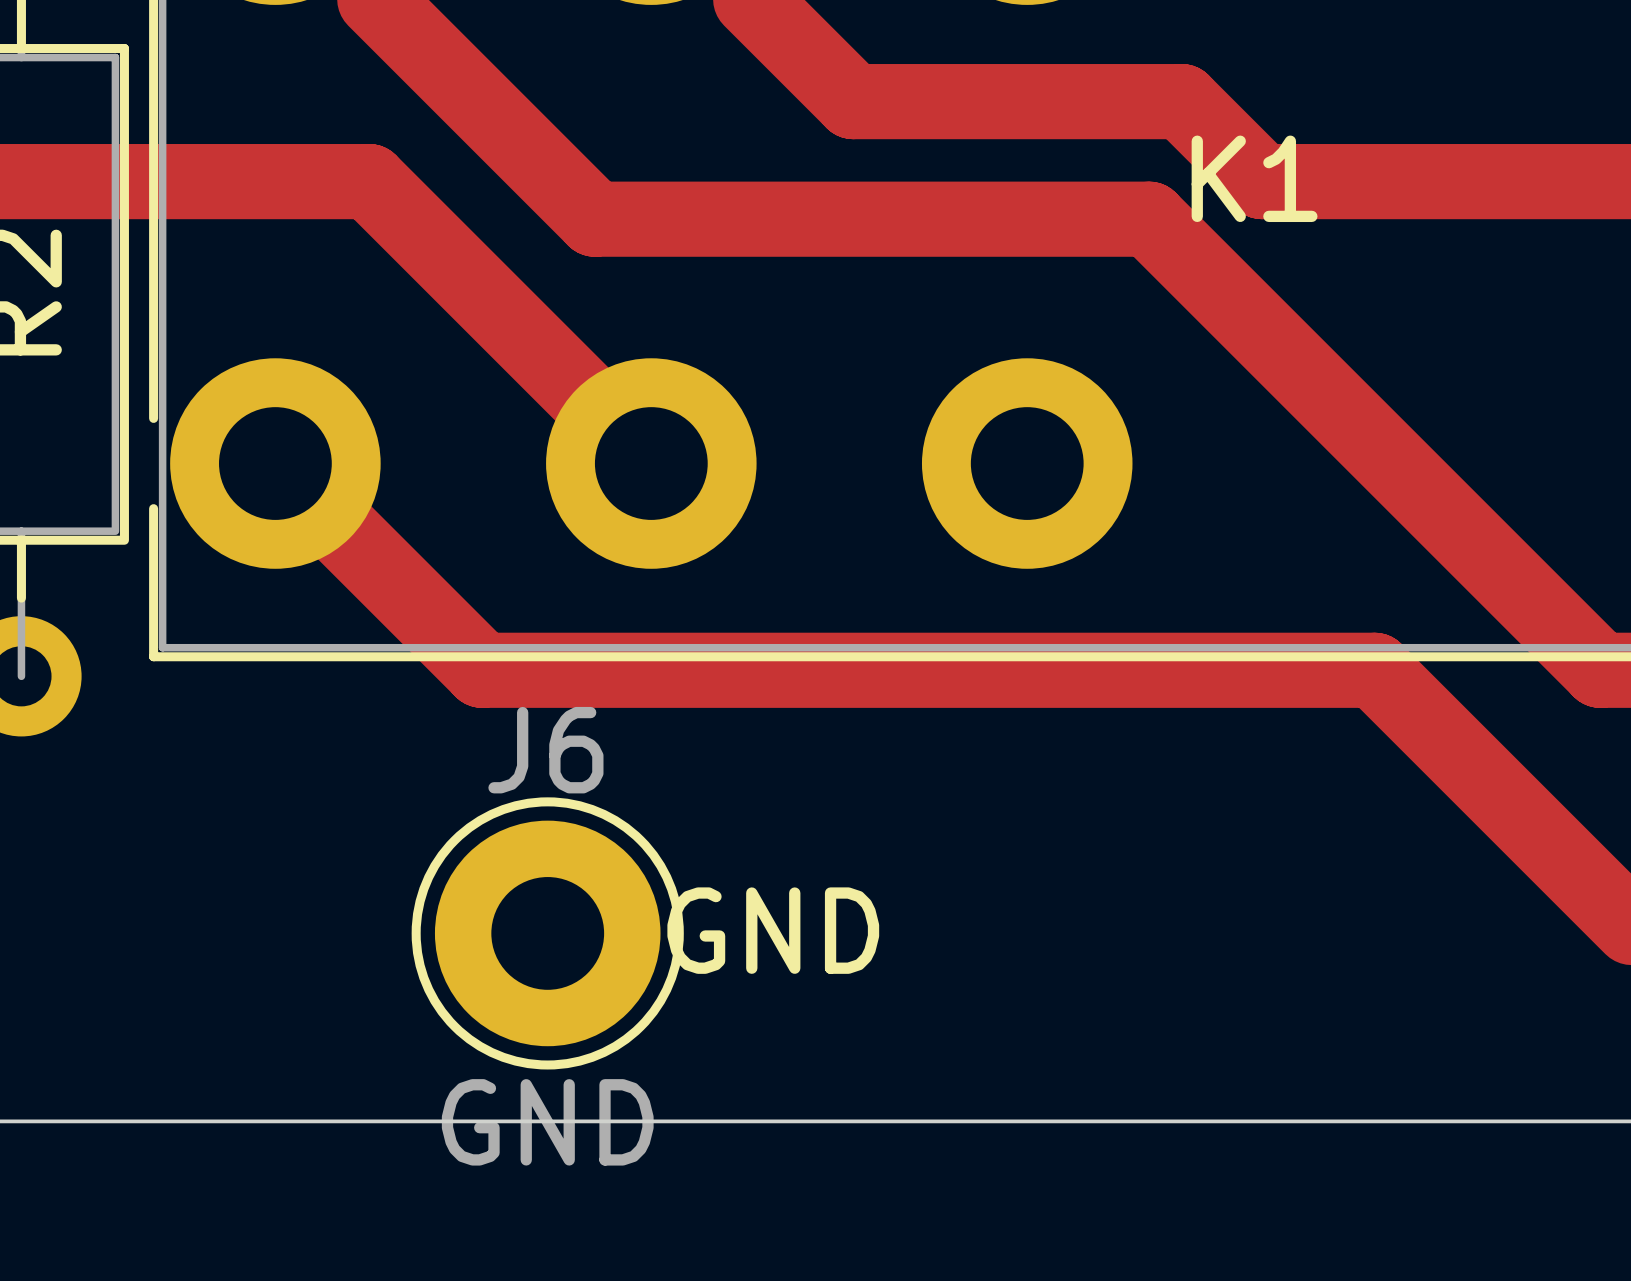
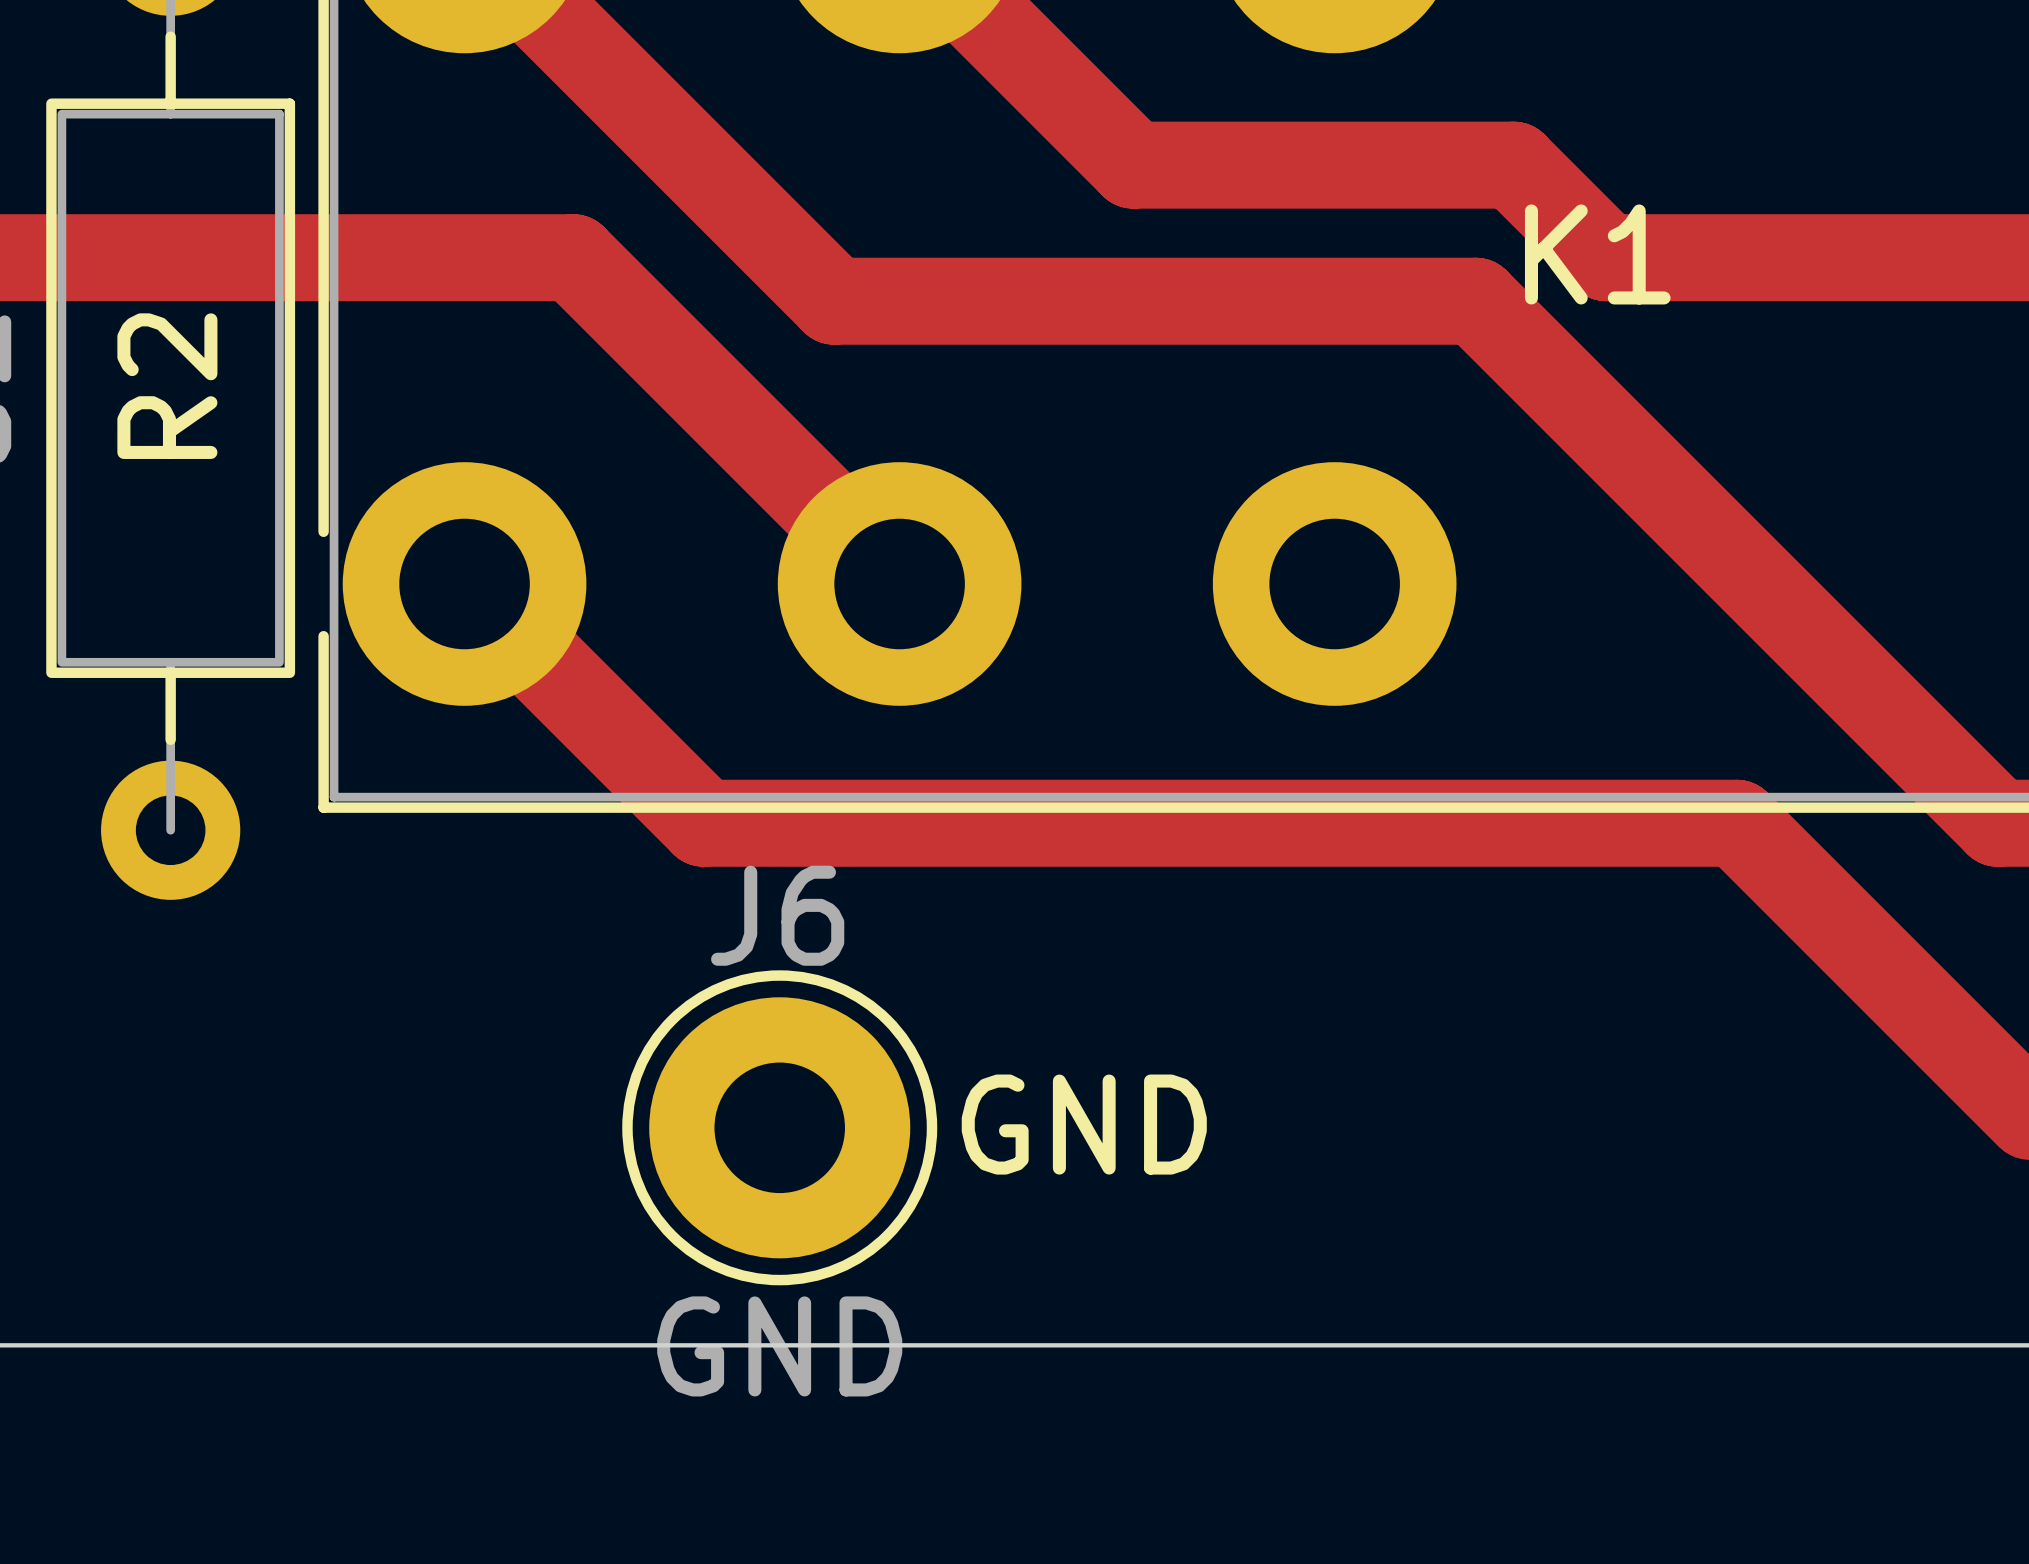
text position: GND (773, 930) -> GND (1084, 1124)

